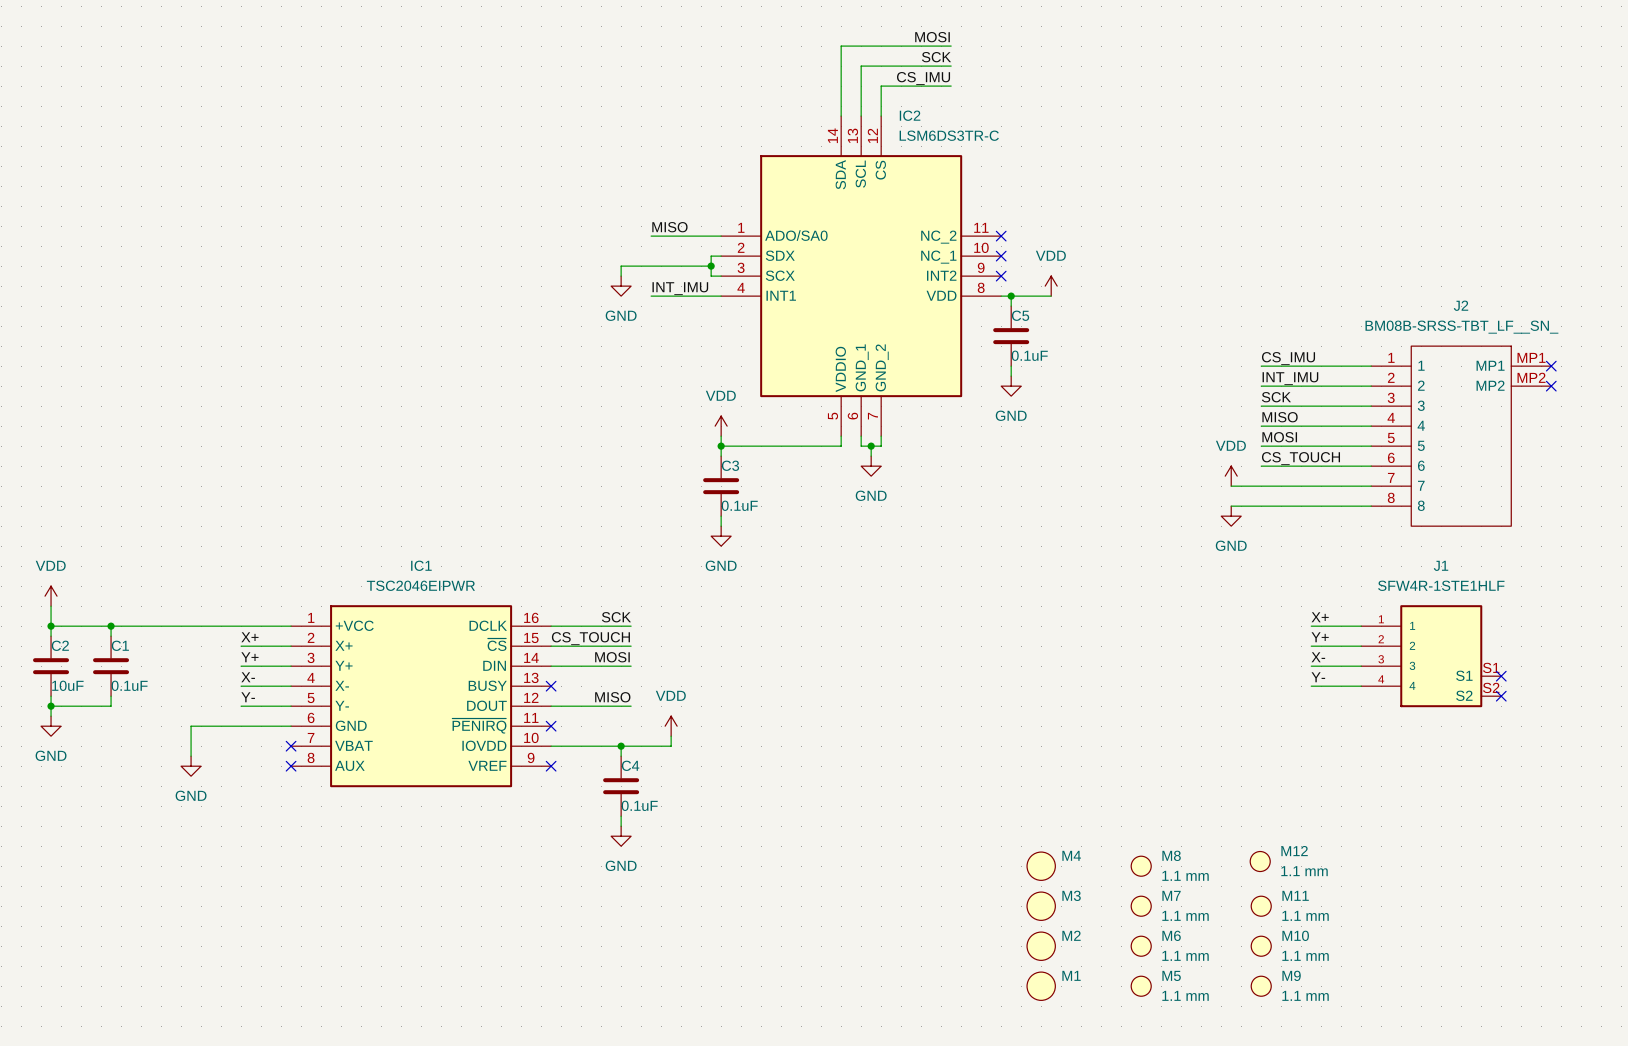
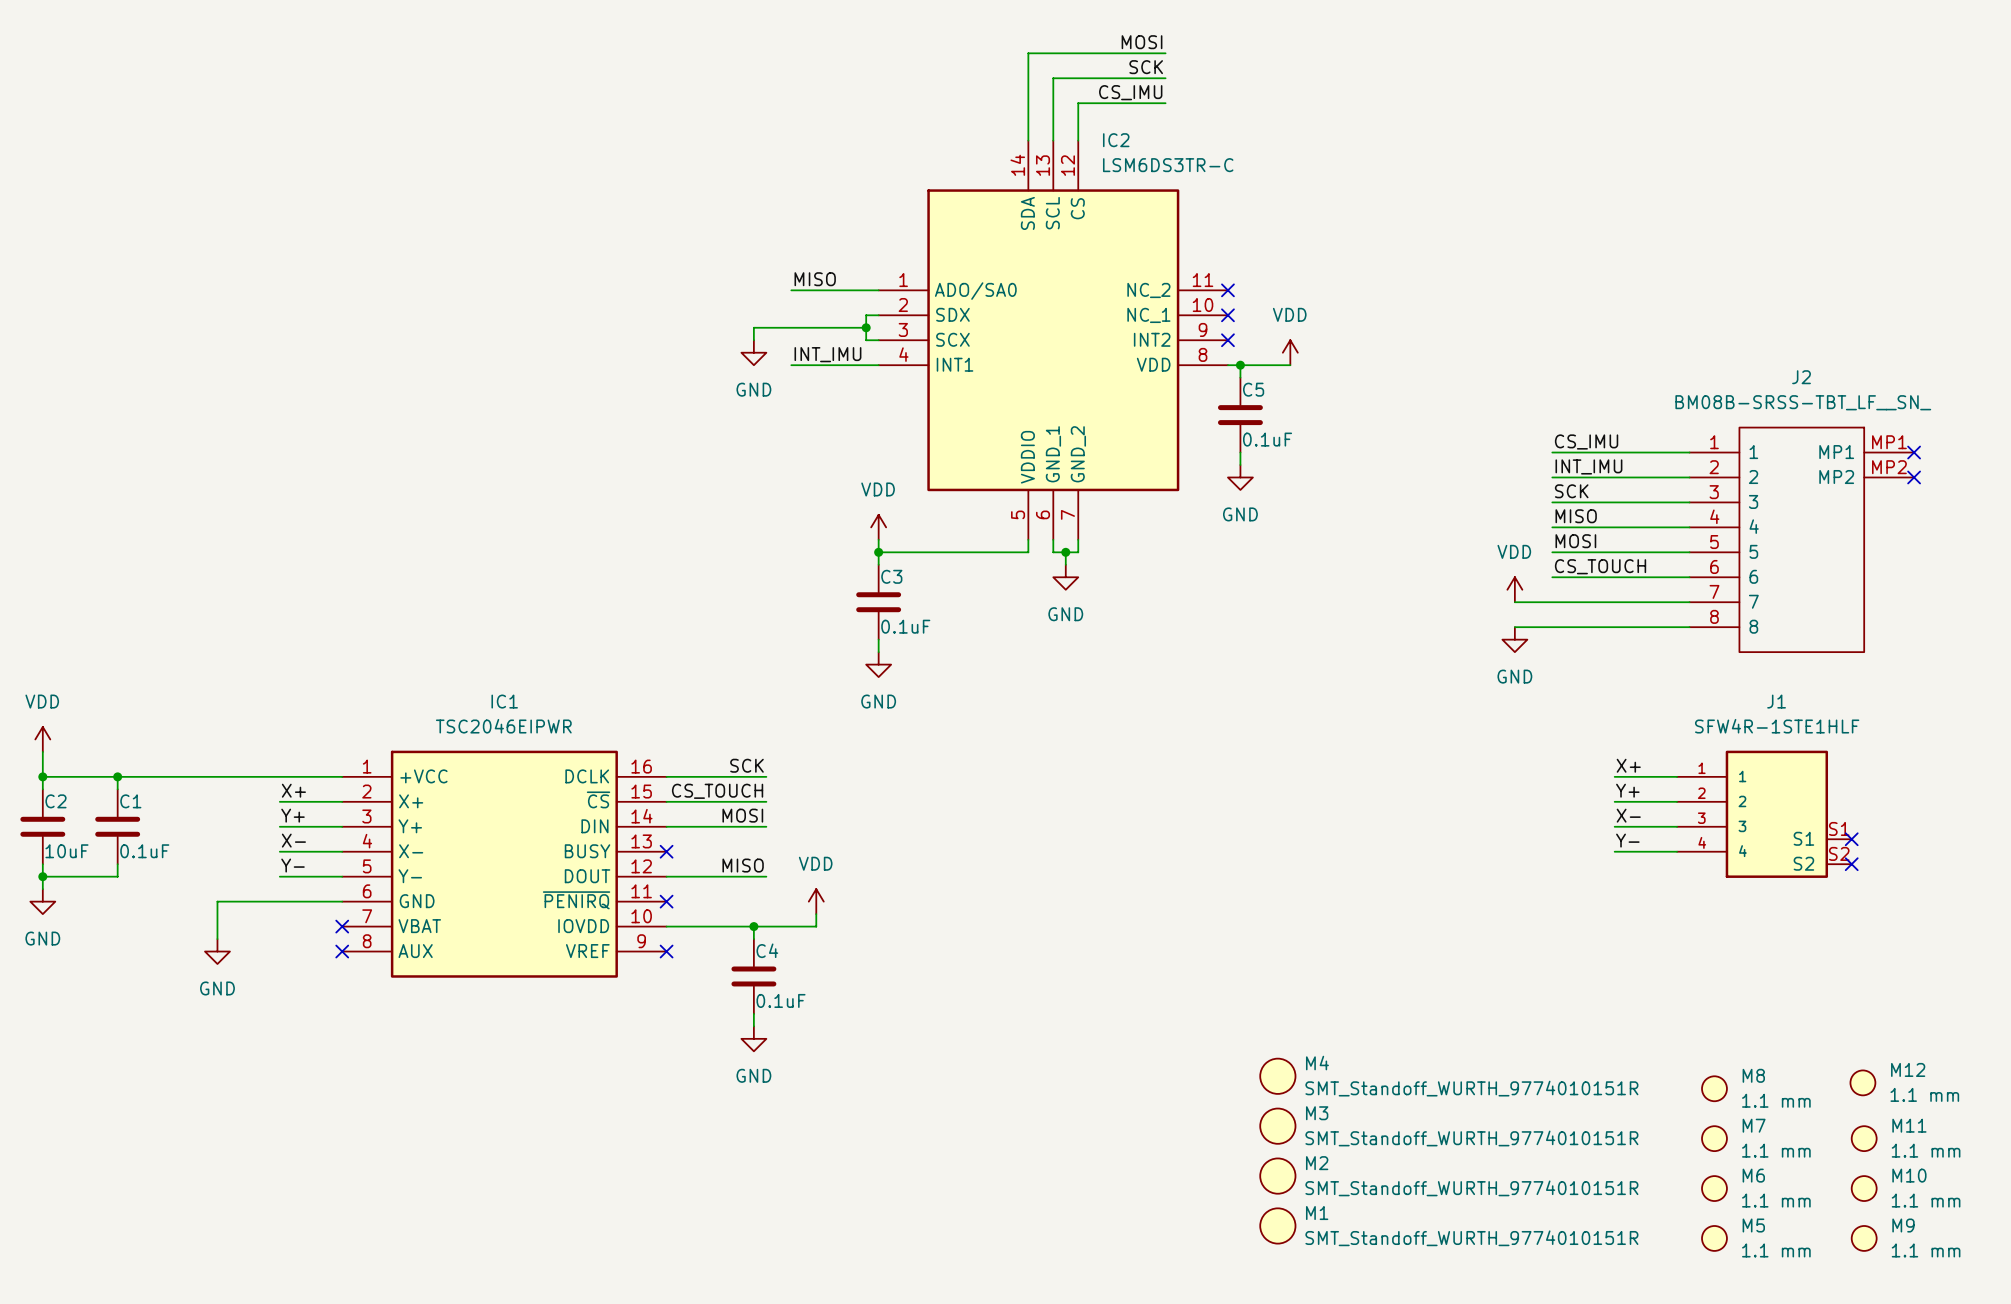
M12 position: (1260, 861) -> (1862, 1082)
M8 position: (1141, 866) -> (1714, 1088)
M4 text: none -> SMT_Standoff_WURTH_9774010151R (1471, 1088)
M7 position: (1141, 906) -> (1714, 1138)
M11 position: (1261, 906) -> (1864, 1138)
M3 text: none -> SMT_Standoff_WURTH_9774010151R (1471, 1138)
M6 position: (1141, 946) -> (1714, 1188)
M10 position: (1261, 946) -> (1864, 1188)
M2 text: none -> SMT_Standoff_WURTH_9774010151R (1471, 1188)
M5 position: (1141, 986) -> (1714, 1238)
M9 position: (1261, 986) -> (1864, 1238)
M1 text: none -> SMT_Standoff_WURTH_9774010151R (1471, 1238)

